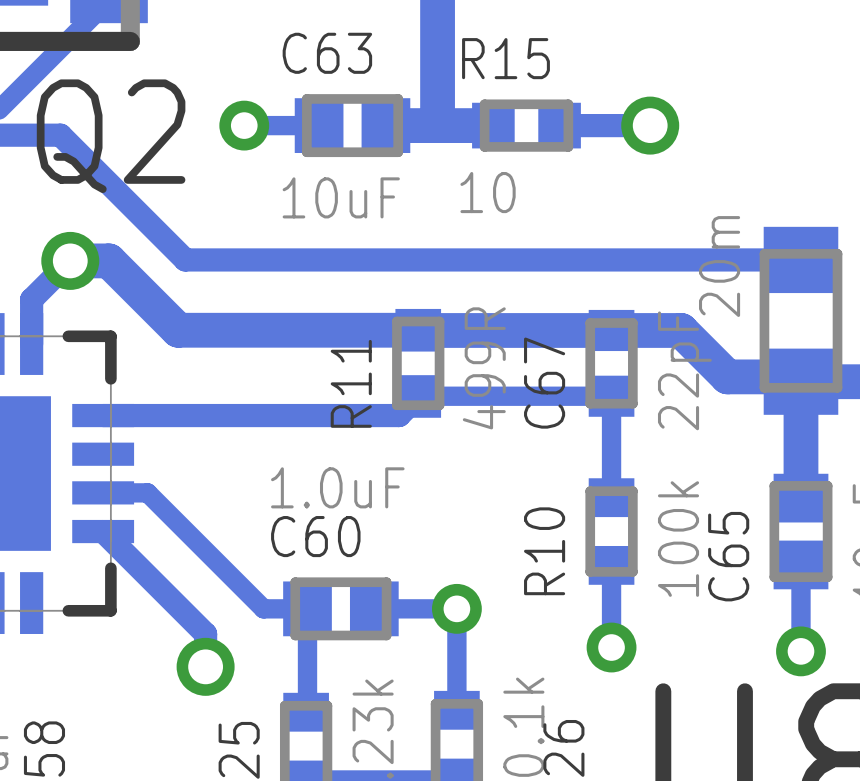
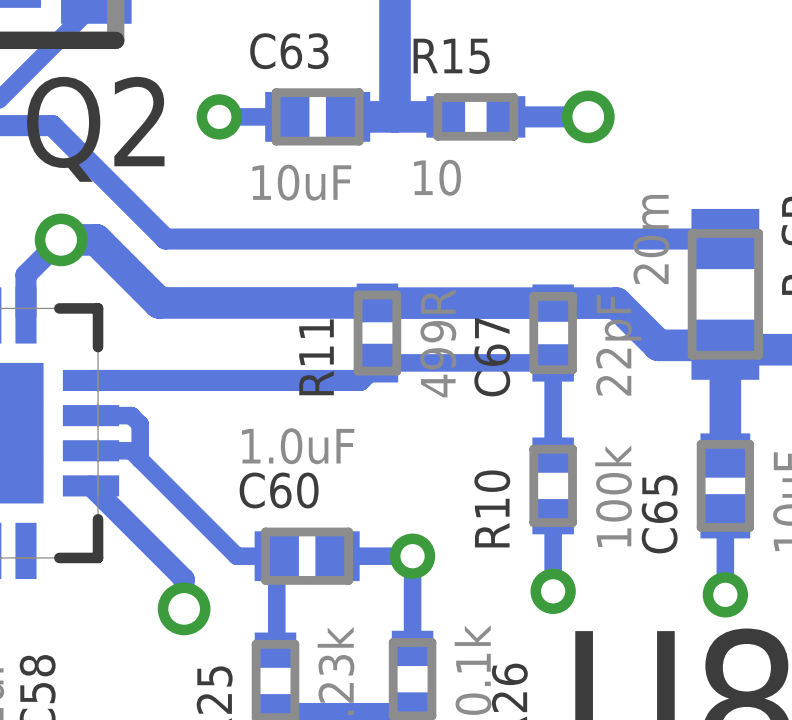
track: none -> (91, 415) (131, 415) (140, 424) (140, 459)

